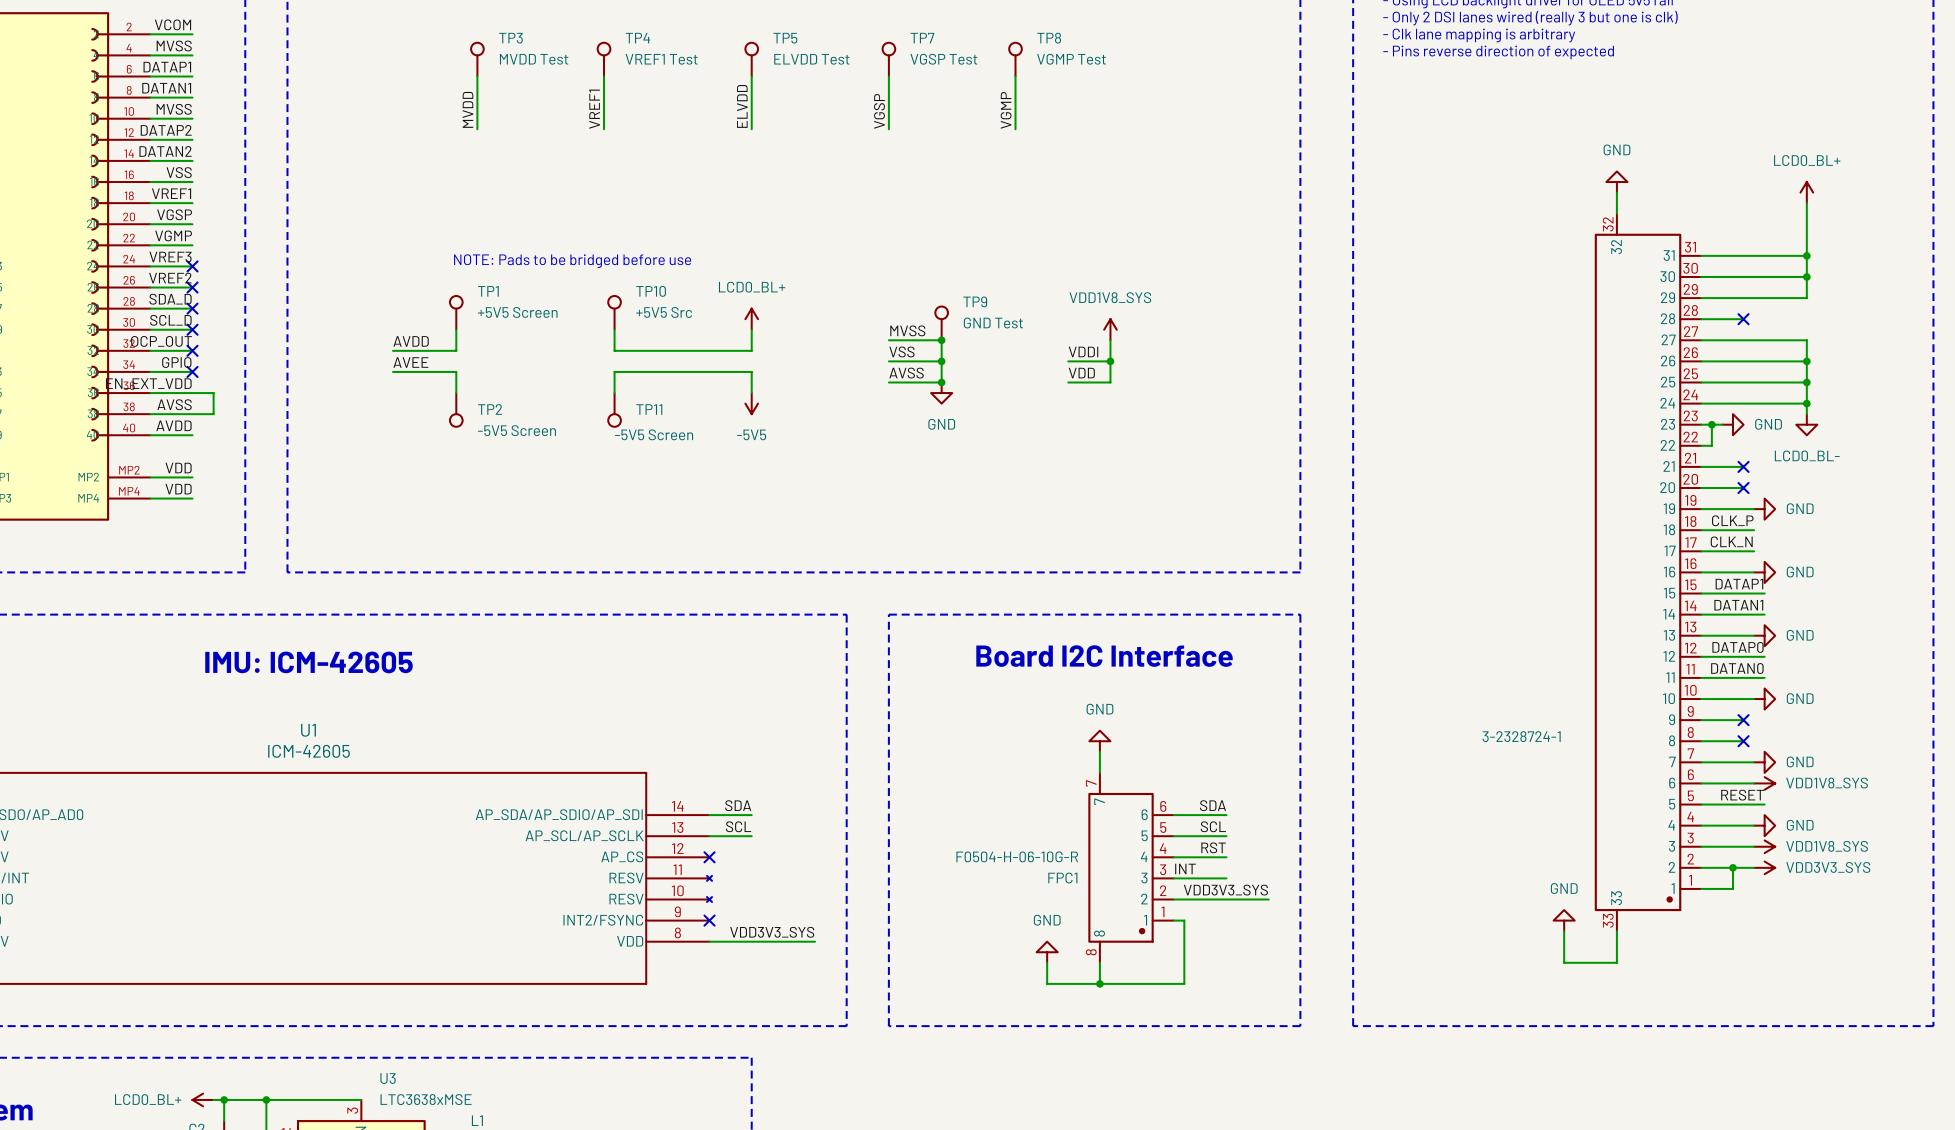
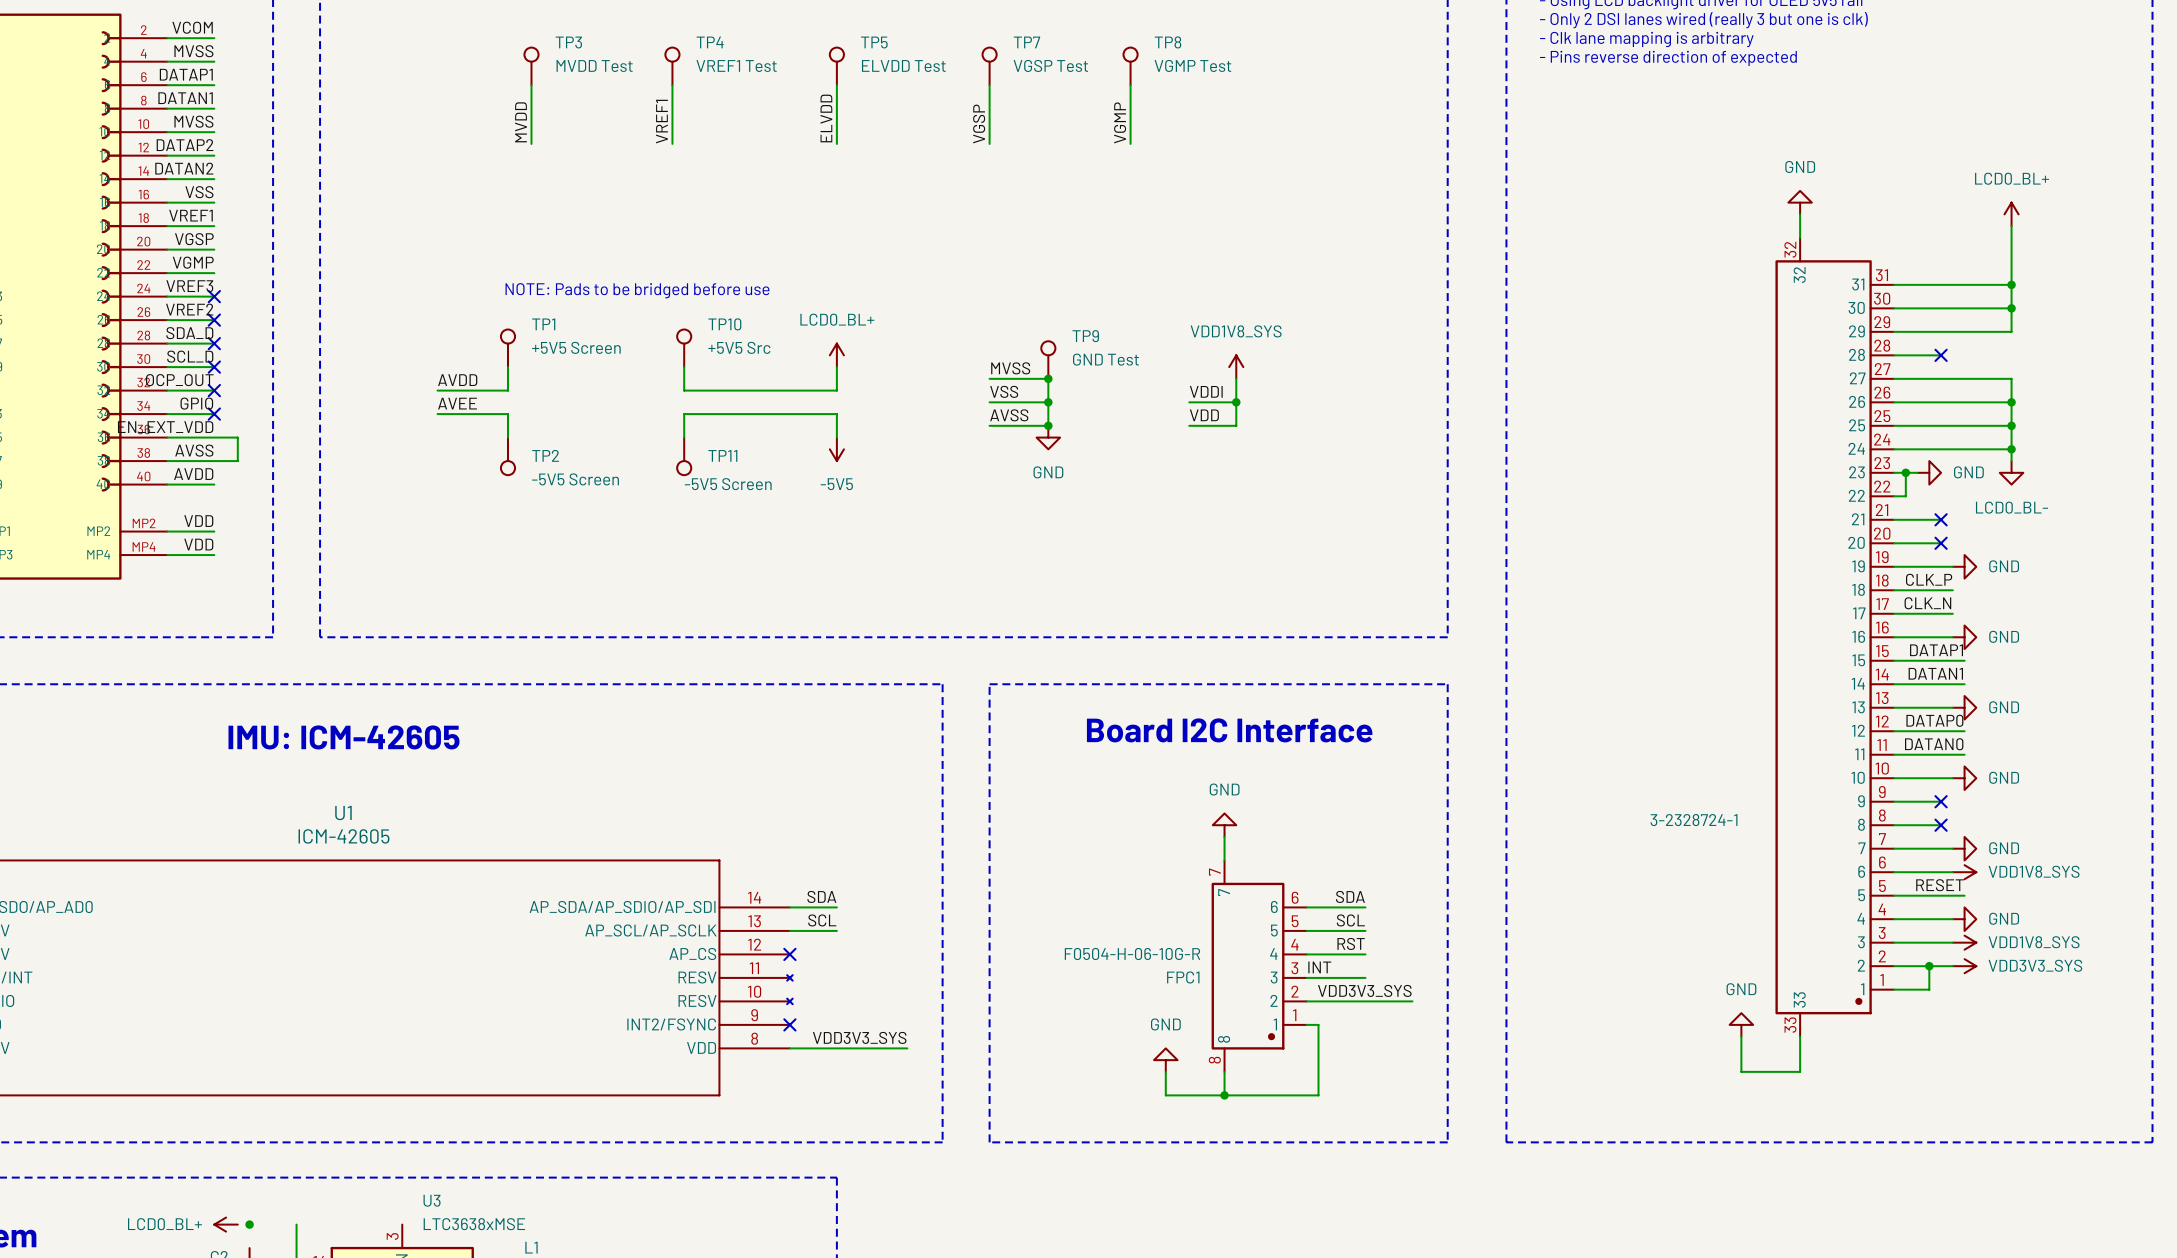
wire: (213, 1099) (361, 1099) -> none
wire: (224, 1099) (224, 1121) -> none
junction: (266, 1099) -> none

